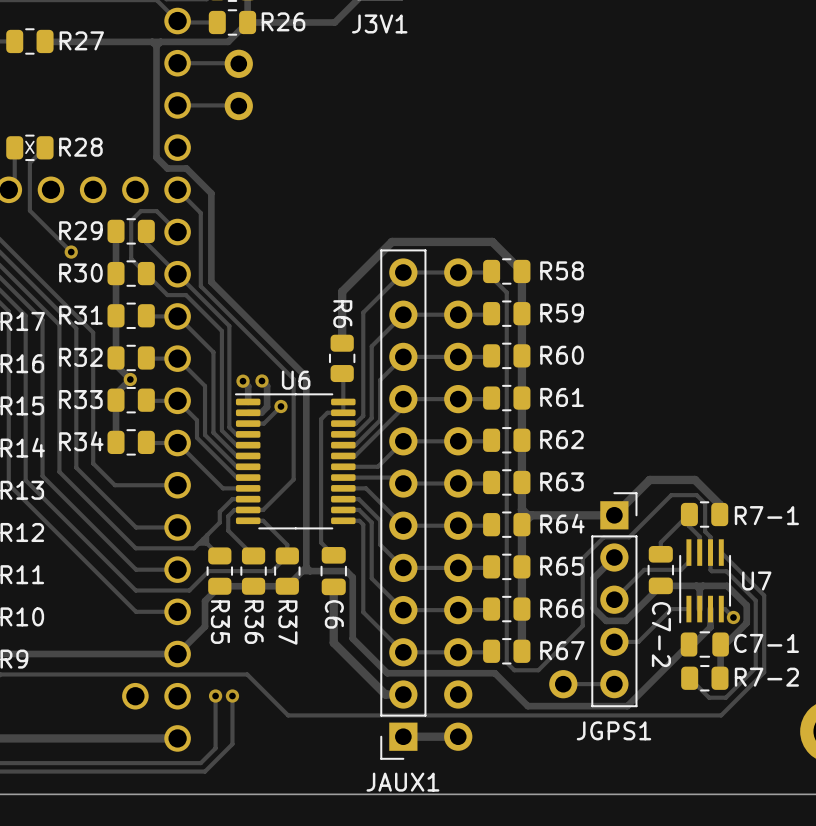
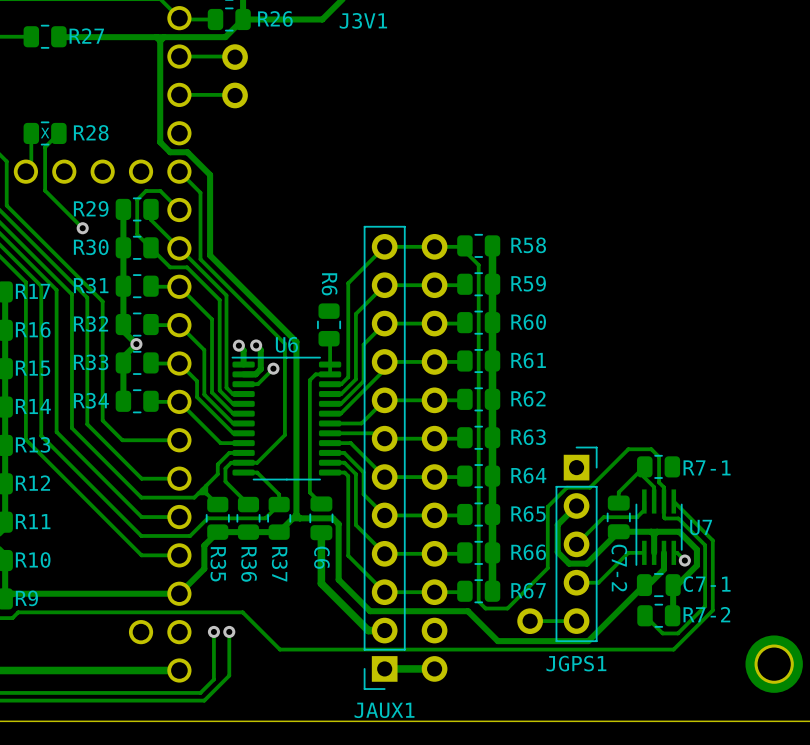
track: (521, 271) (492, 241) (391, 241) (342, 291) (342, 343) -> none
track: (521, 509) (527, 515) (614, 515) (649, 479) (694, 479) (719, 504) (719, 514) -> none

